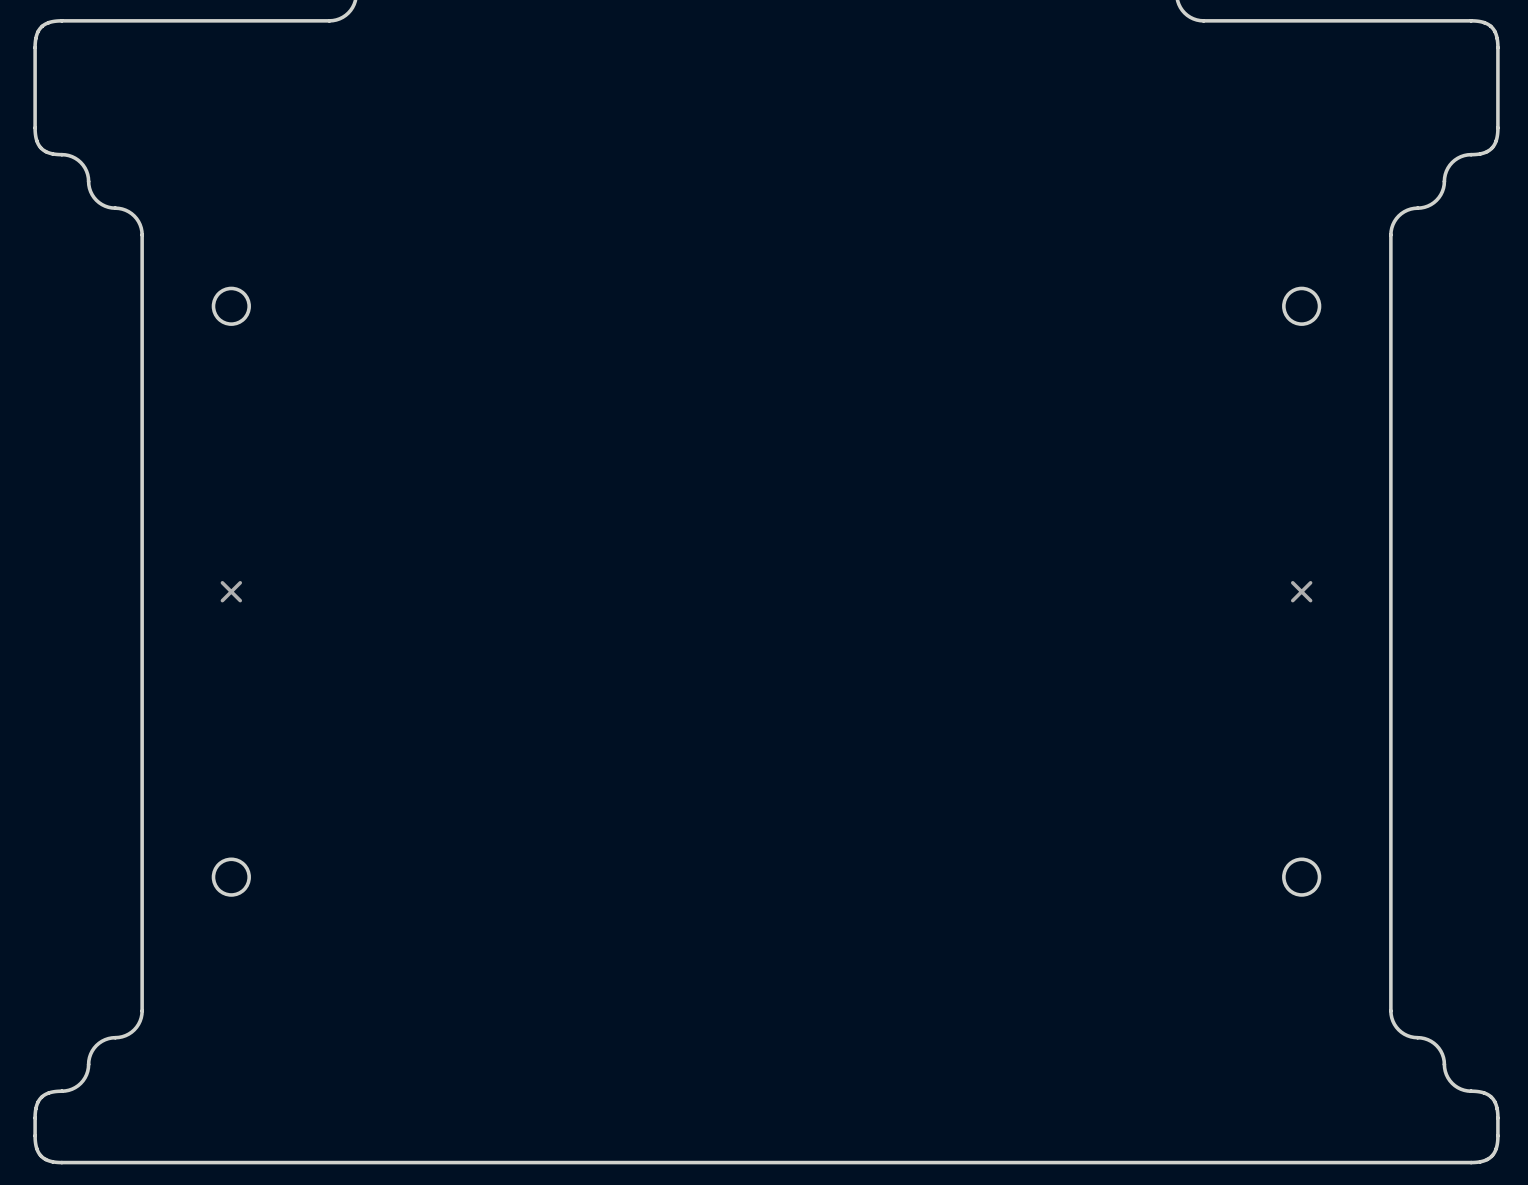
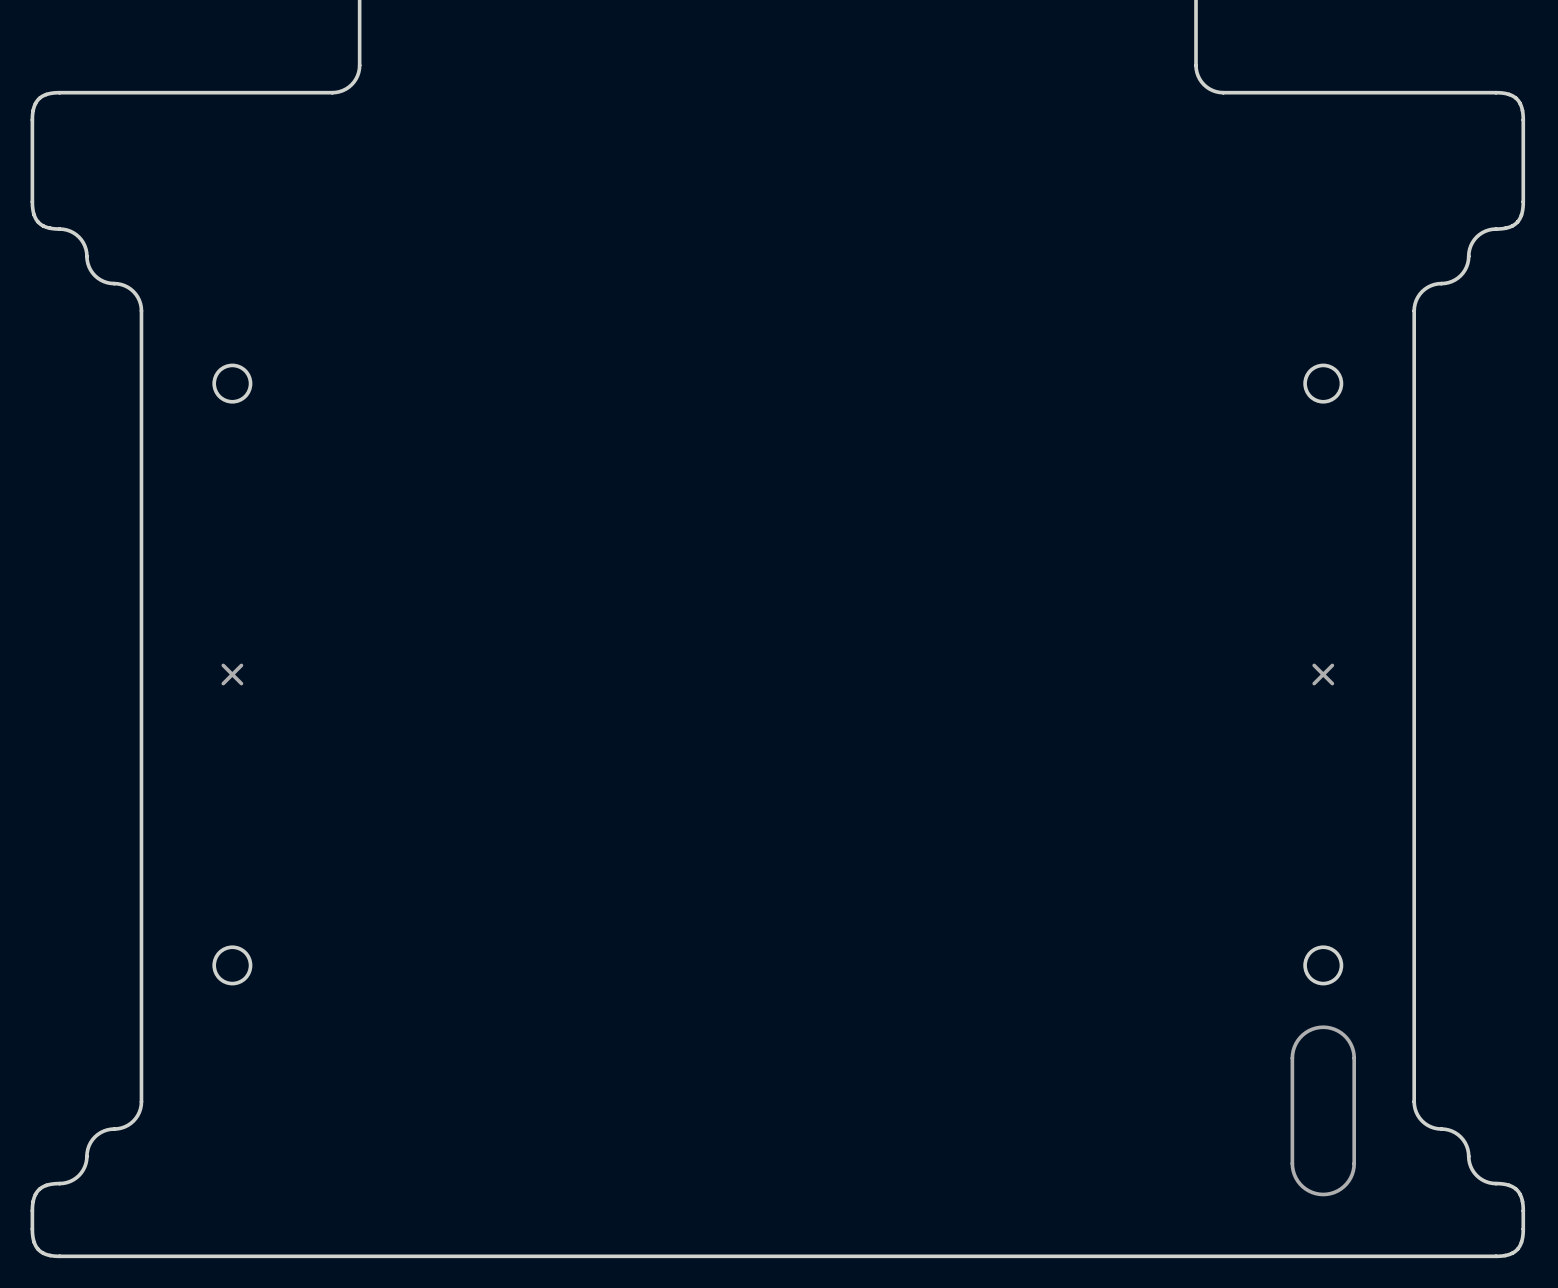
line: none -> (1292, 1058) (1293, 1170) (1300, 1184) (1308, 1190) (1319, 1194) (1330, 1193) (1346, 1184) (1353, 1167) (1353, 1050) (1348, 1040) (1340, 1032) (1330, 1028) (1319, 1027) (1308, 1030) (1300, 1037) (1294, 1047) (1292, 1058)

